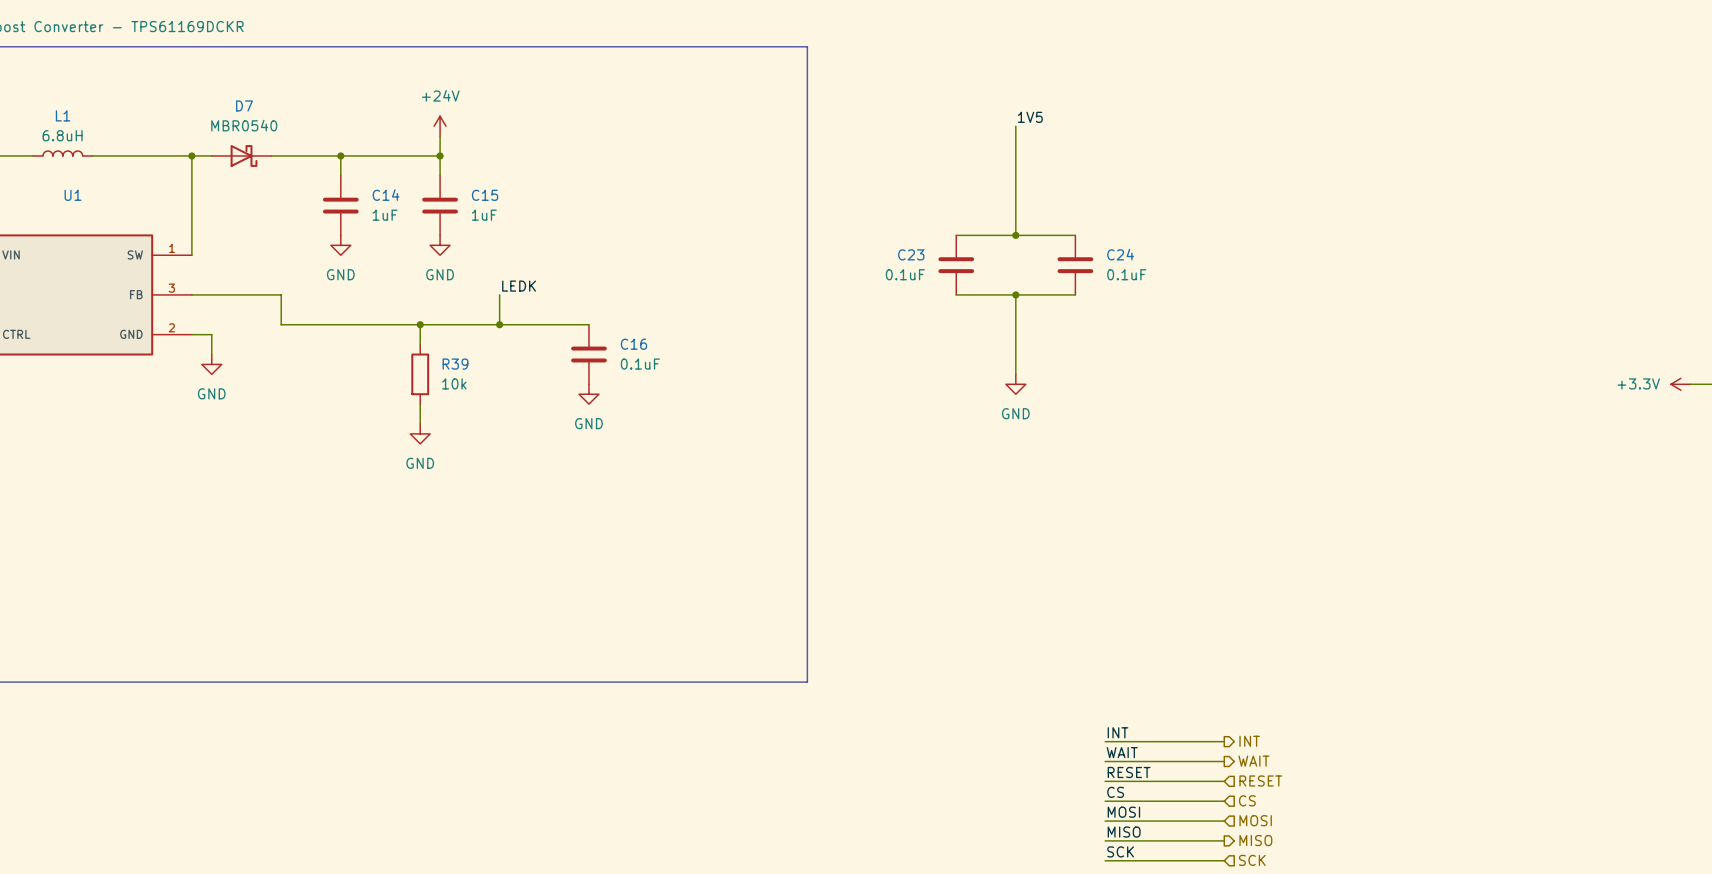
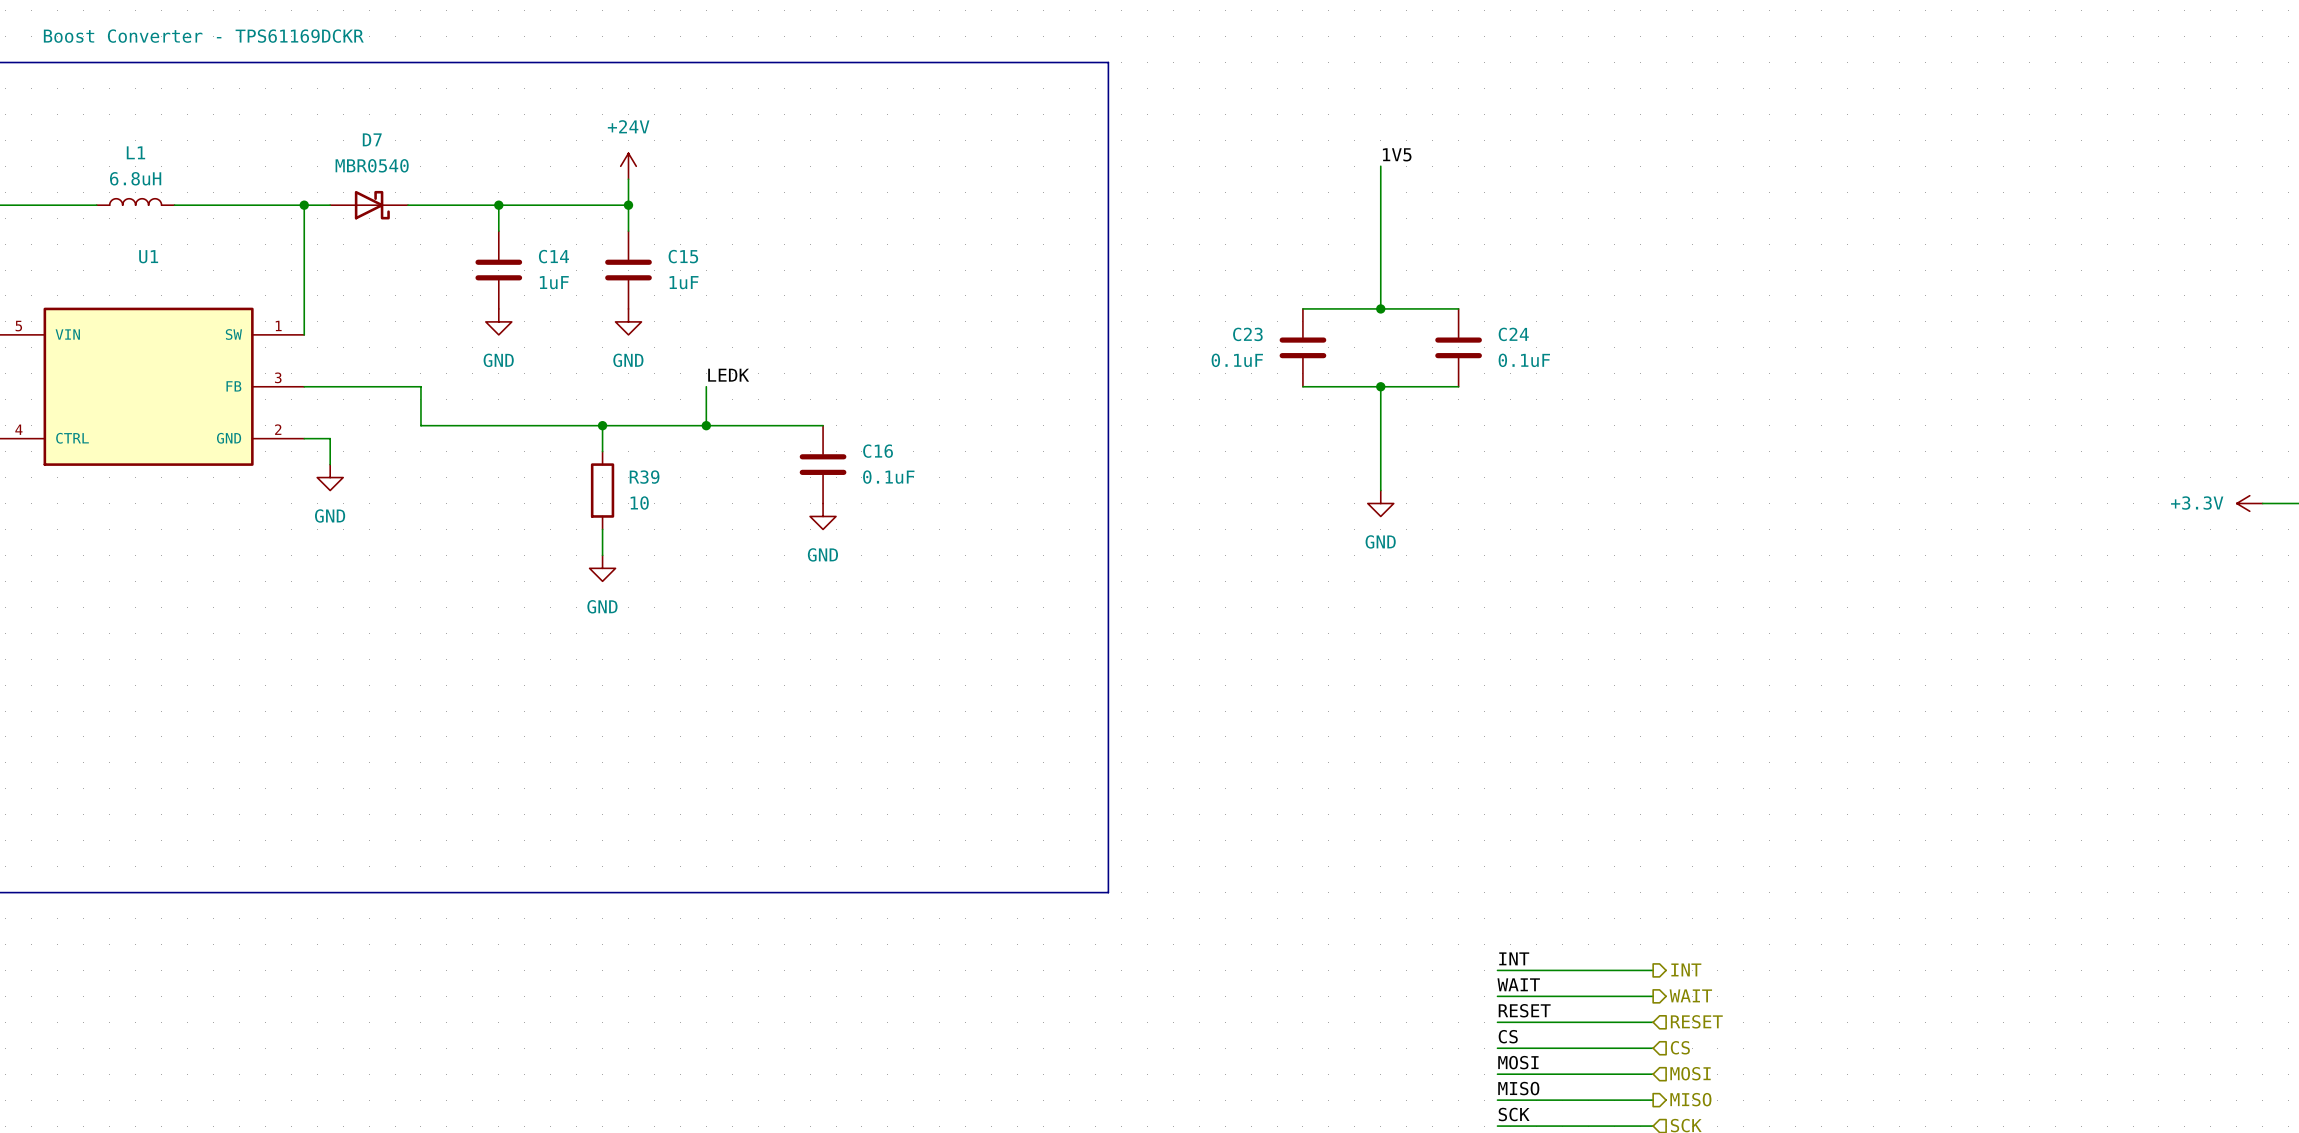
R39 value: 10k (454, 383) -> 10 (639, 503)

